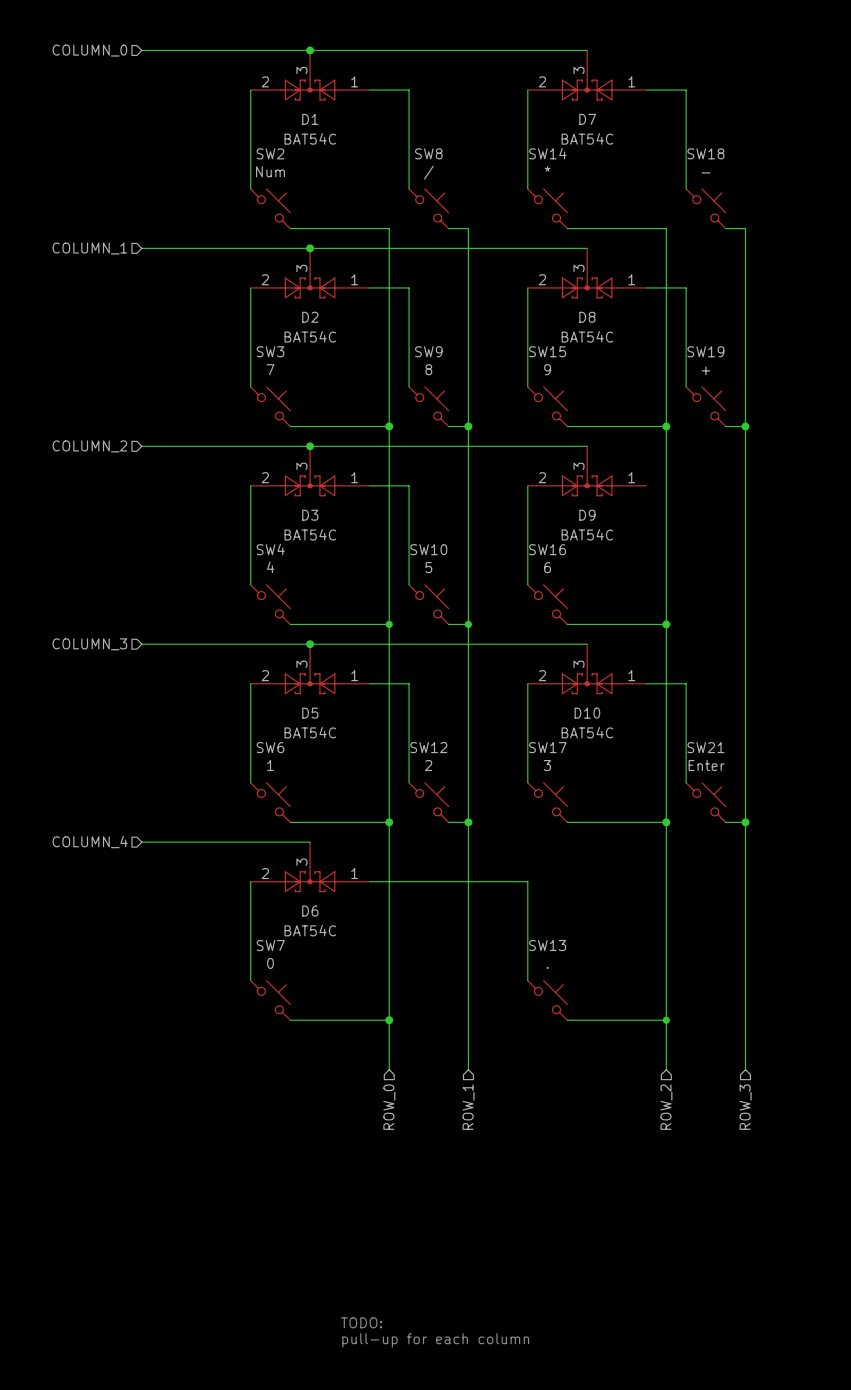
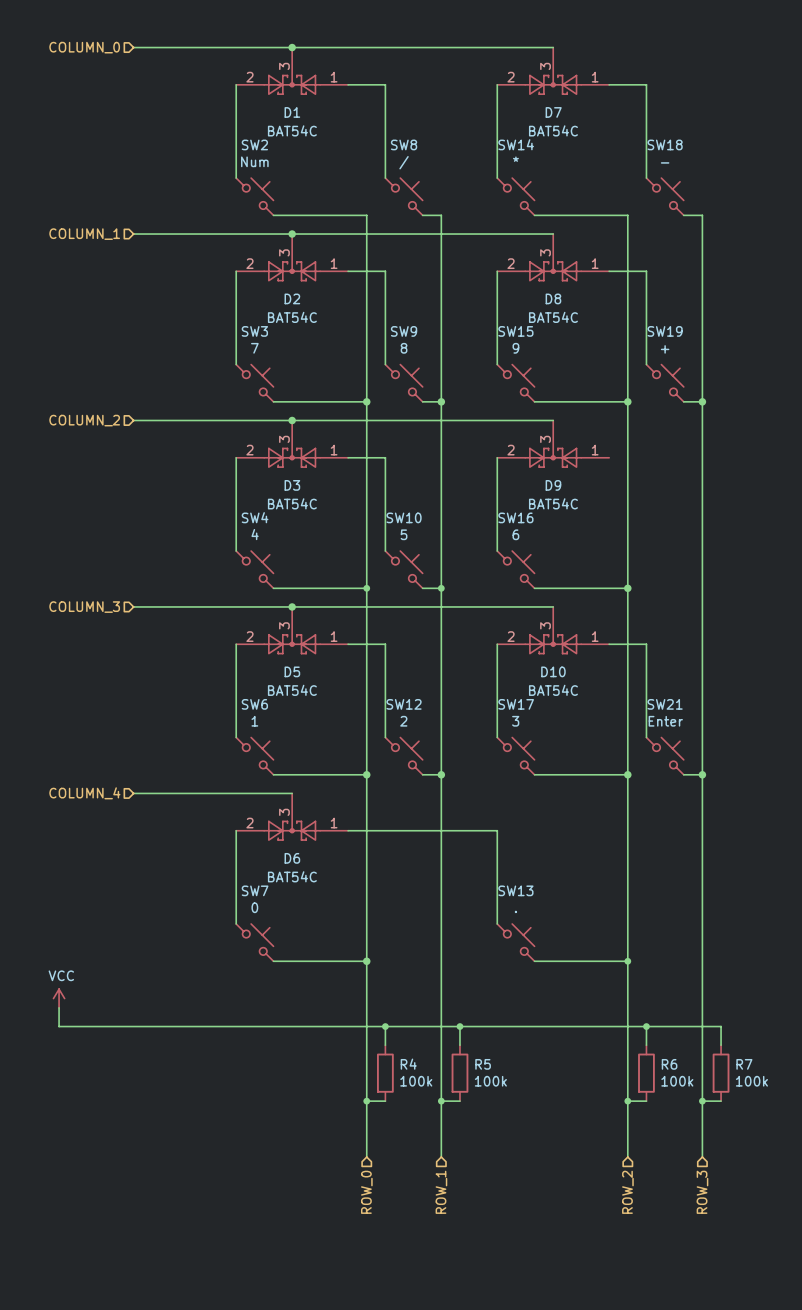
power symbol: none -> VCC (59, 998)
wire: none -> (59, 1007) (59, 1026) (721, 1026) (721, 1045)
wire: none -> (366, 1007) (366, 1157)
wire: none -> (441, 1007) (441, 1157)
wire: none -> (627, 1007) (627, 1157)
wire: none -> (702, 1007) (702, 1157)
wire: none -> (385, 1026) (385, 1045)
junction: none -> (385, 1026)
wire: none -> (459, 1026) (459, 1045)
junction: none -> (459, 1026)
wire: none -> (646, 1026) (646, 1045)
junction: none -> (646, 1026)
hierarchical label position: ROW_0 (389, 1107) -> ROW_0 (366, 1192)
hierarchical label position: ROW_1 (468, 1107) -> ROW_1 (441, 1192)
hierarchical label position: ROW_2 (666, 1107) -> ROW_2 (627, 1192)
hierarchical label position: ROW_3 (745, 1107) -> ROW_3 (702, 1192)
R4: none -> 100k (385, 1073)
R5: none -> 100k (459, 1073)
R6: none -> 100k (646, 1073)
R7: none -> 100k (721, 1073)
wire: none -> (366, 1101) (385, 1101)
junction: none -> (366, 1101)
wire: none -> (441, 1101) (459, 1101)
junction: none -> (441, 1101)
wire: none -> (627, 1101) (646, 1101)
junction: none -> (627, 1101)
wire: none -> (702, 1101) (721, 1101)
junction: none -> (702, 1101)
text: TODO: (361, 1322) -> none
text: pull-up for each column (435, 1340) -> none

